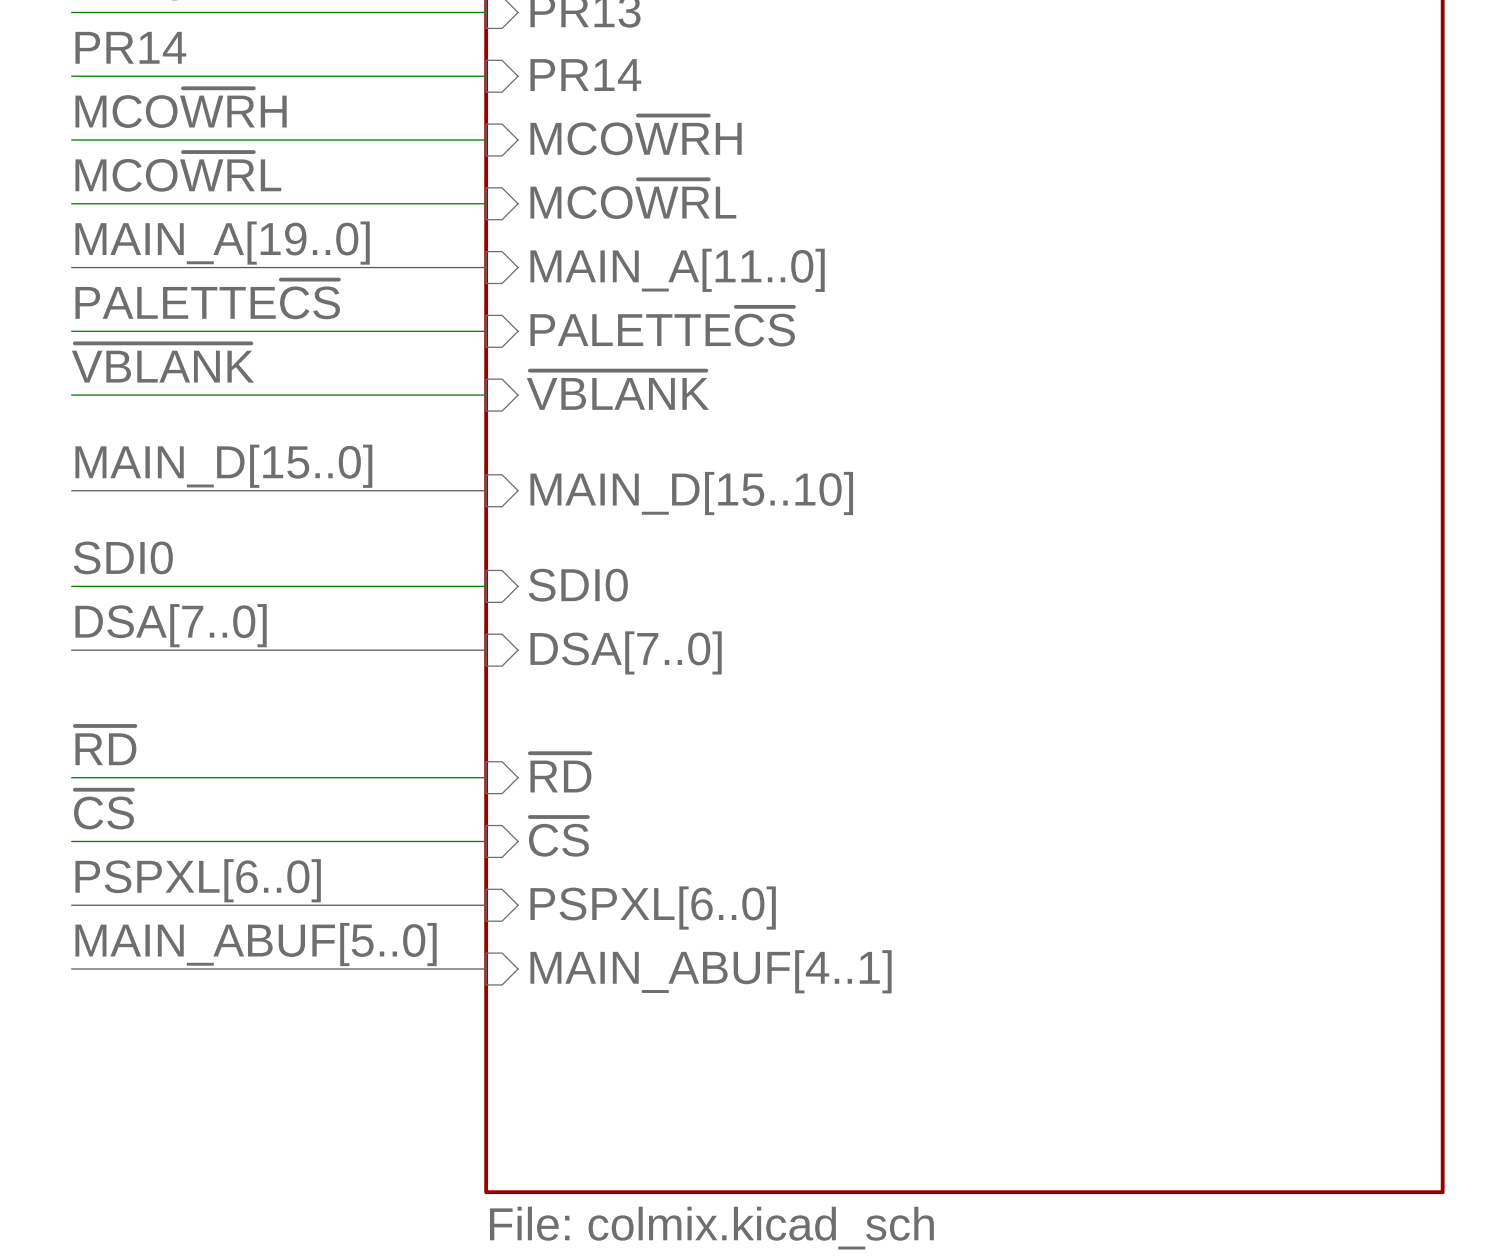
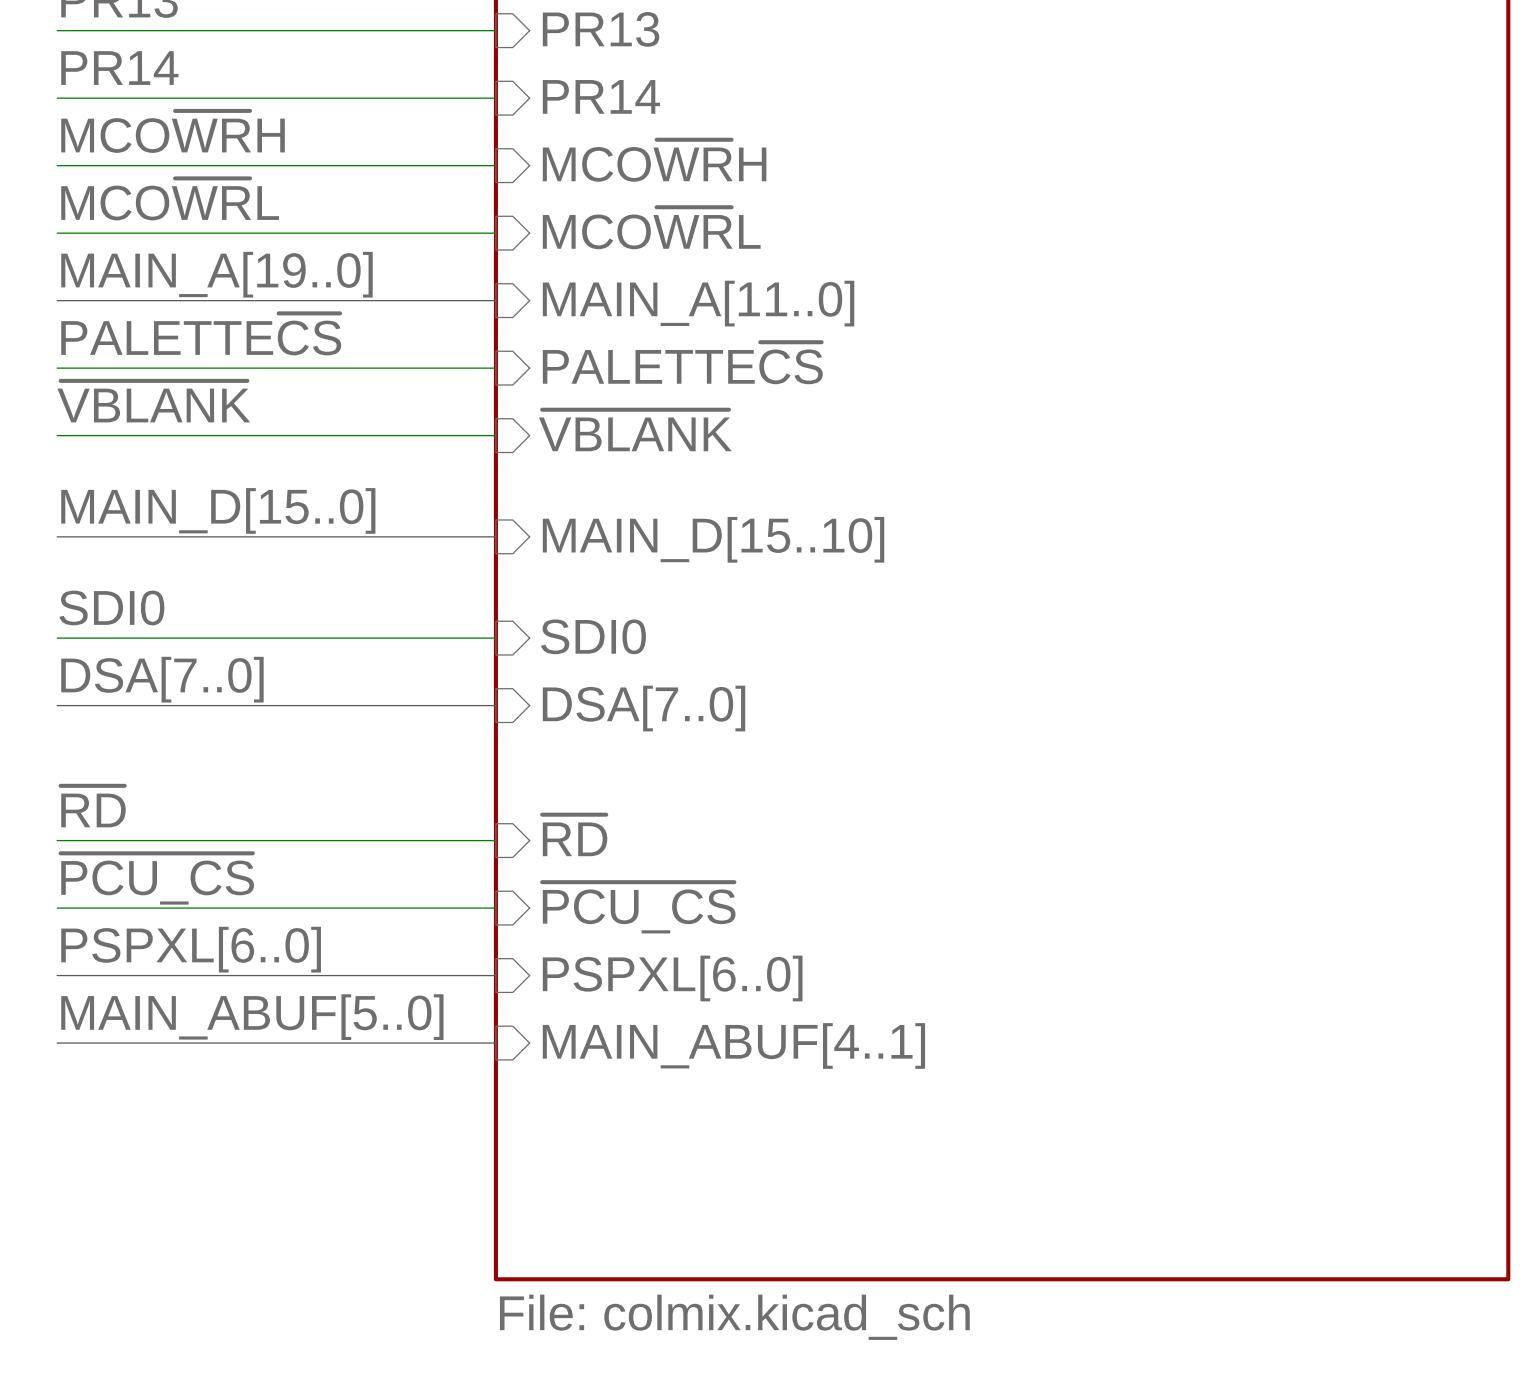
label: ~{CS} (103, 809) -> ~{PCU_CS} (157, 878)
sheet pin: ~{CS} (558, 836) -> ~{PCU_CS} (638, 907)

